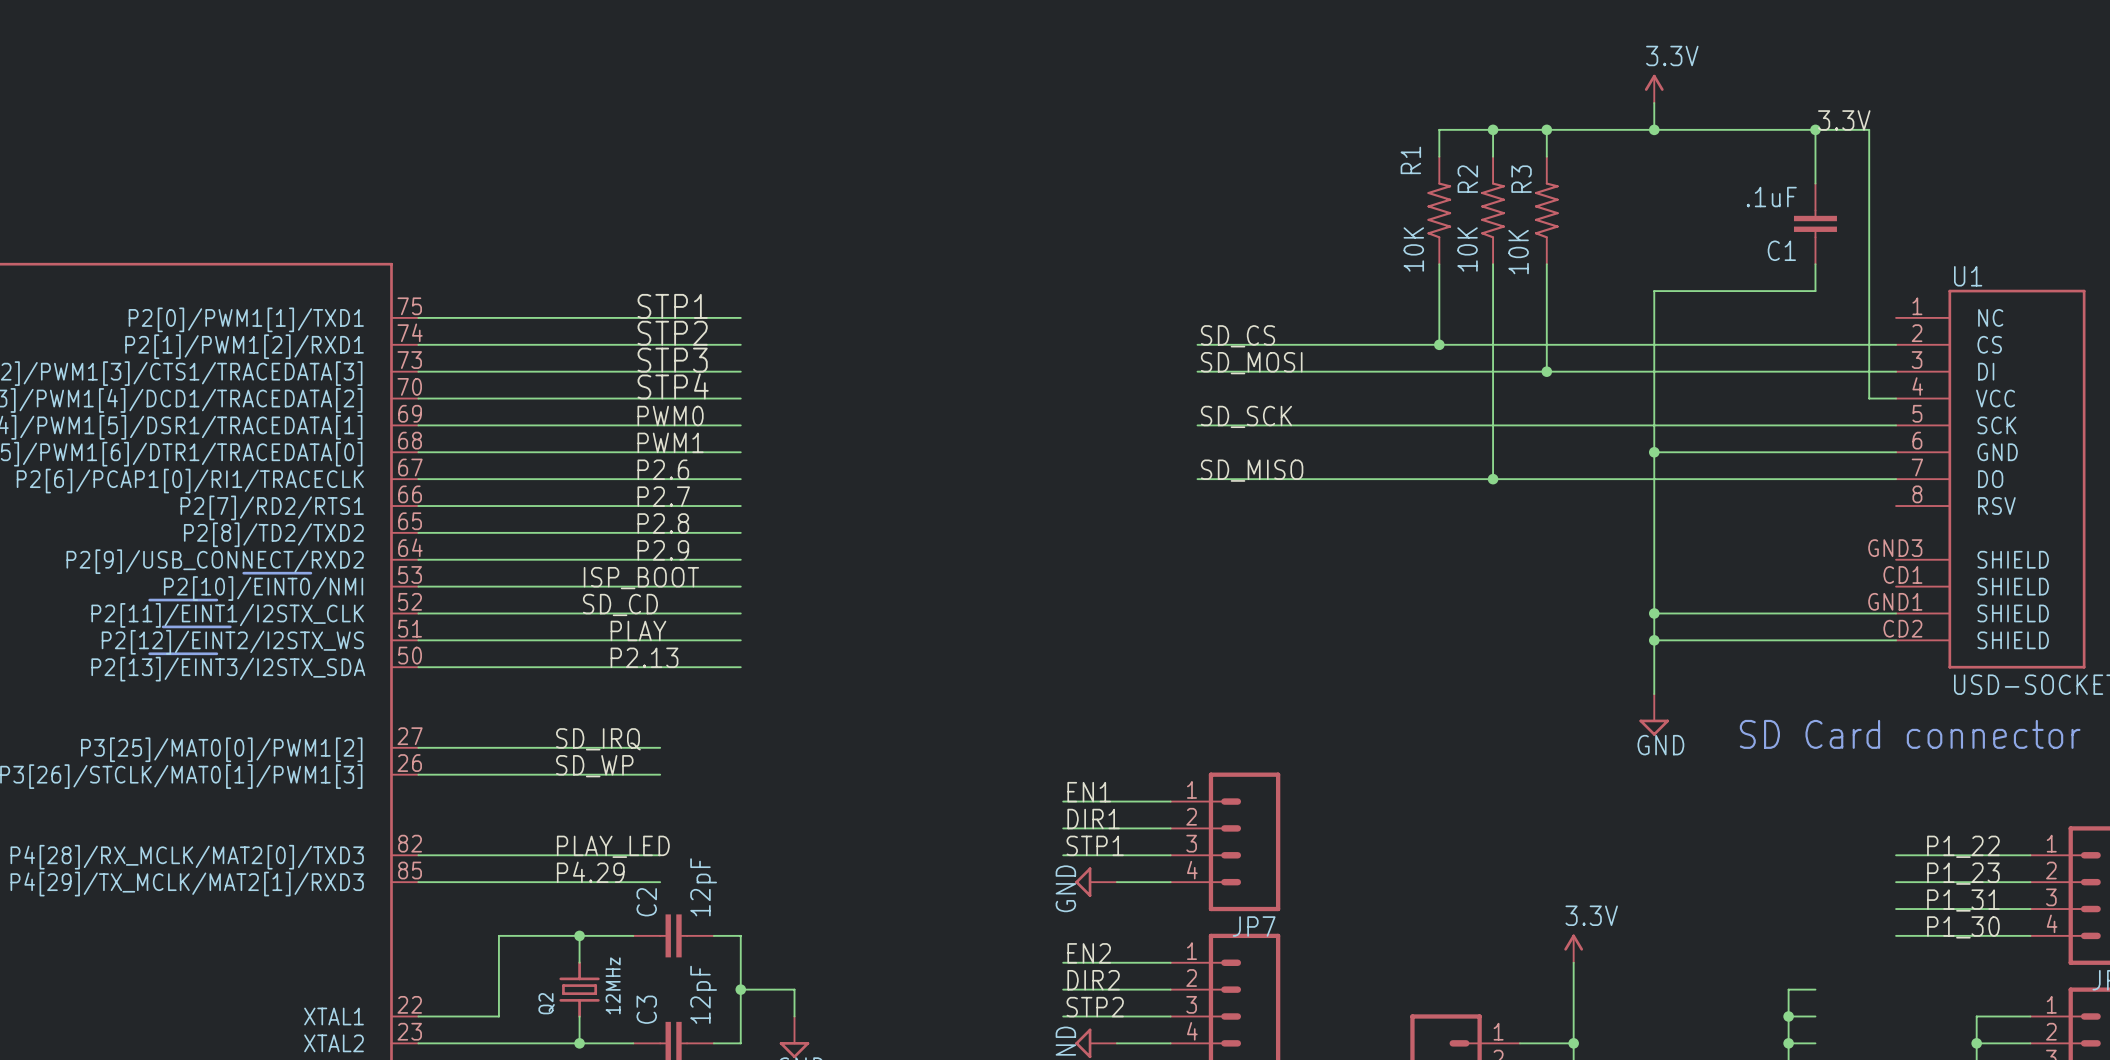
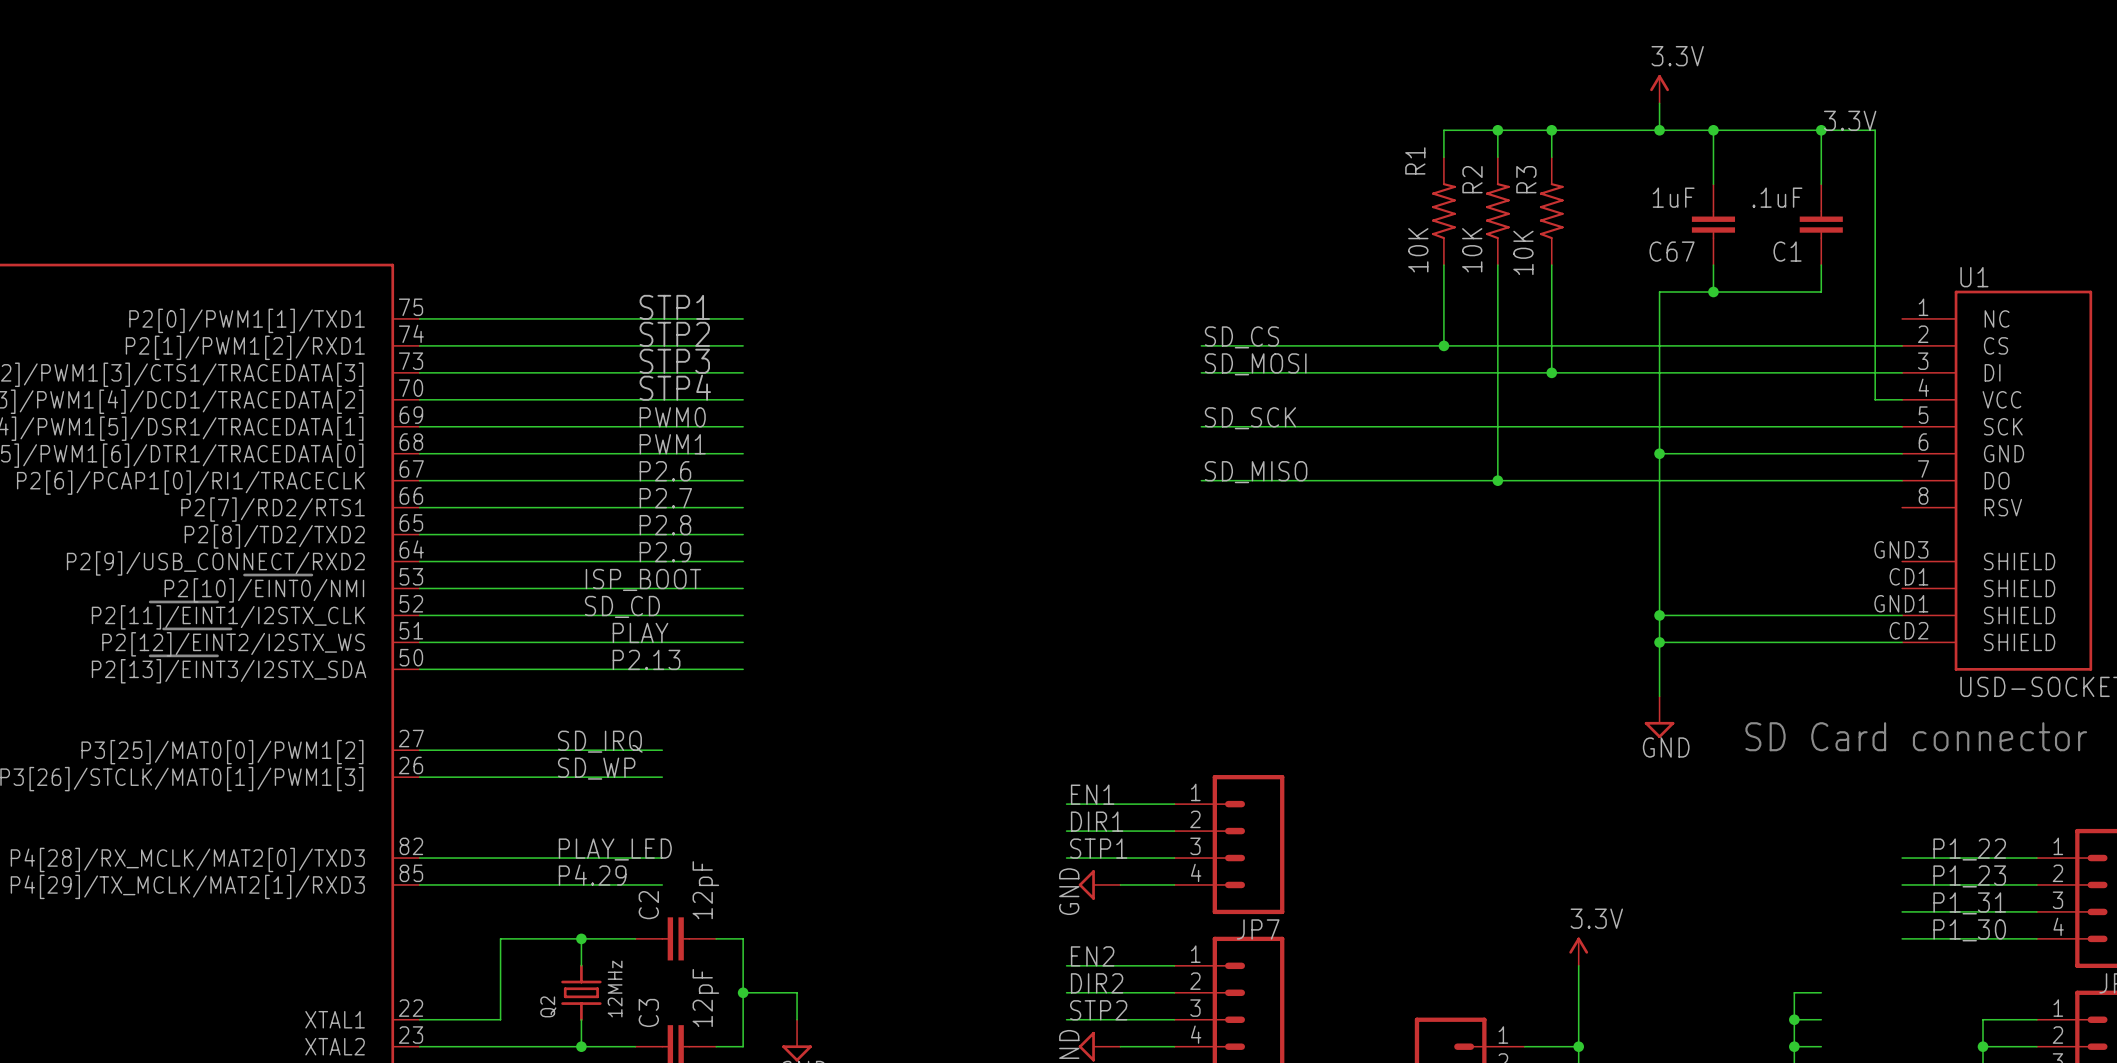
wire: none -> (1713, 130) (1713, 184)
junction: none -> (1713, 130)
C67: none -> 1uF (1713, 224)
wire: none -> (1713, 265) (1713, 292)
junction: none -> (1713, 292)

